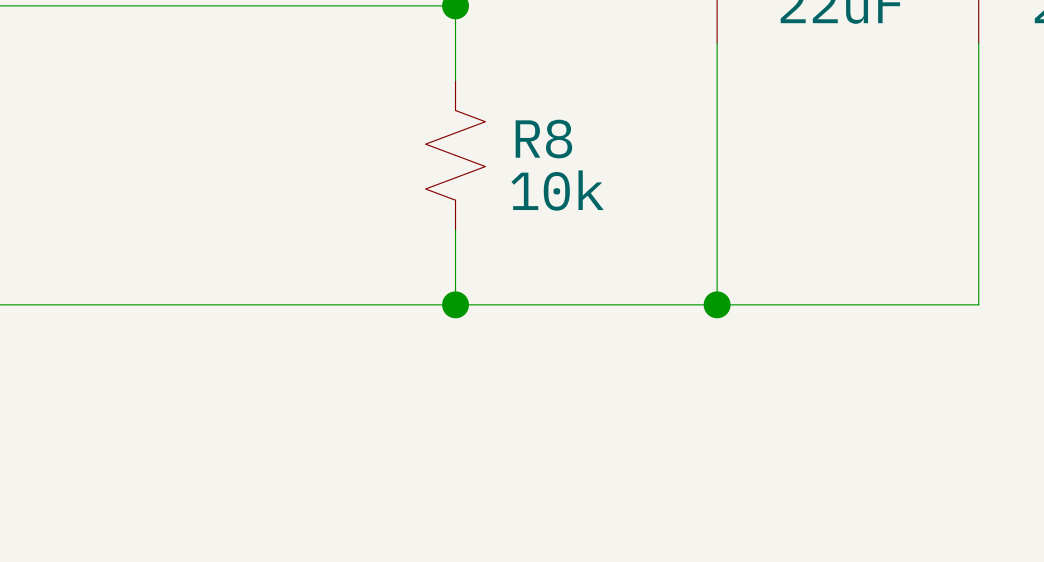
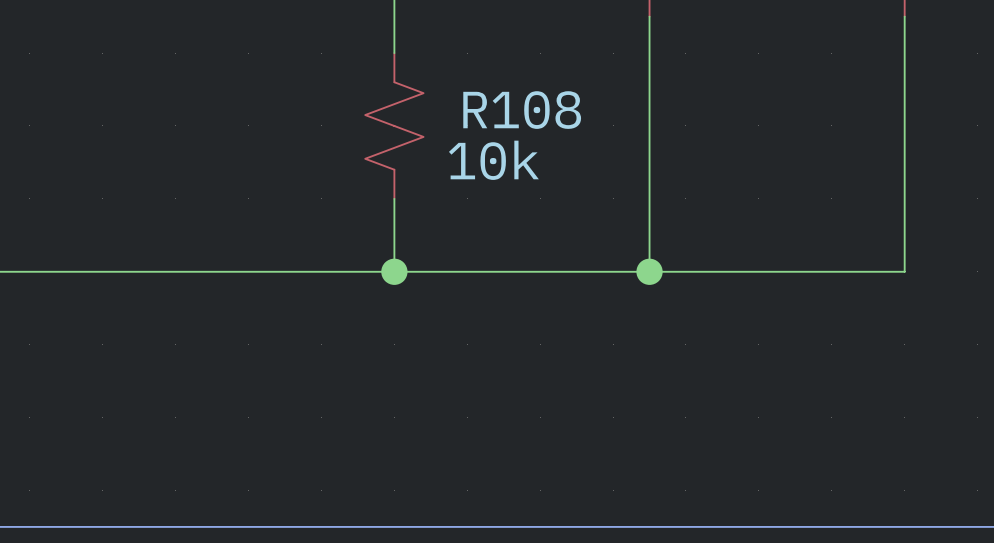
R8 name: R8 (543, 139) -> R108 (522, 110)

